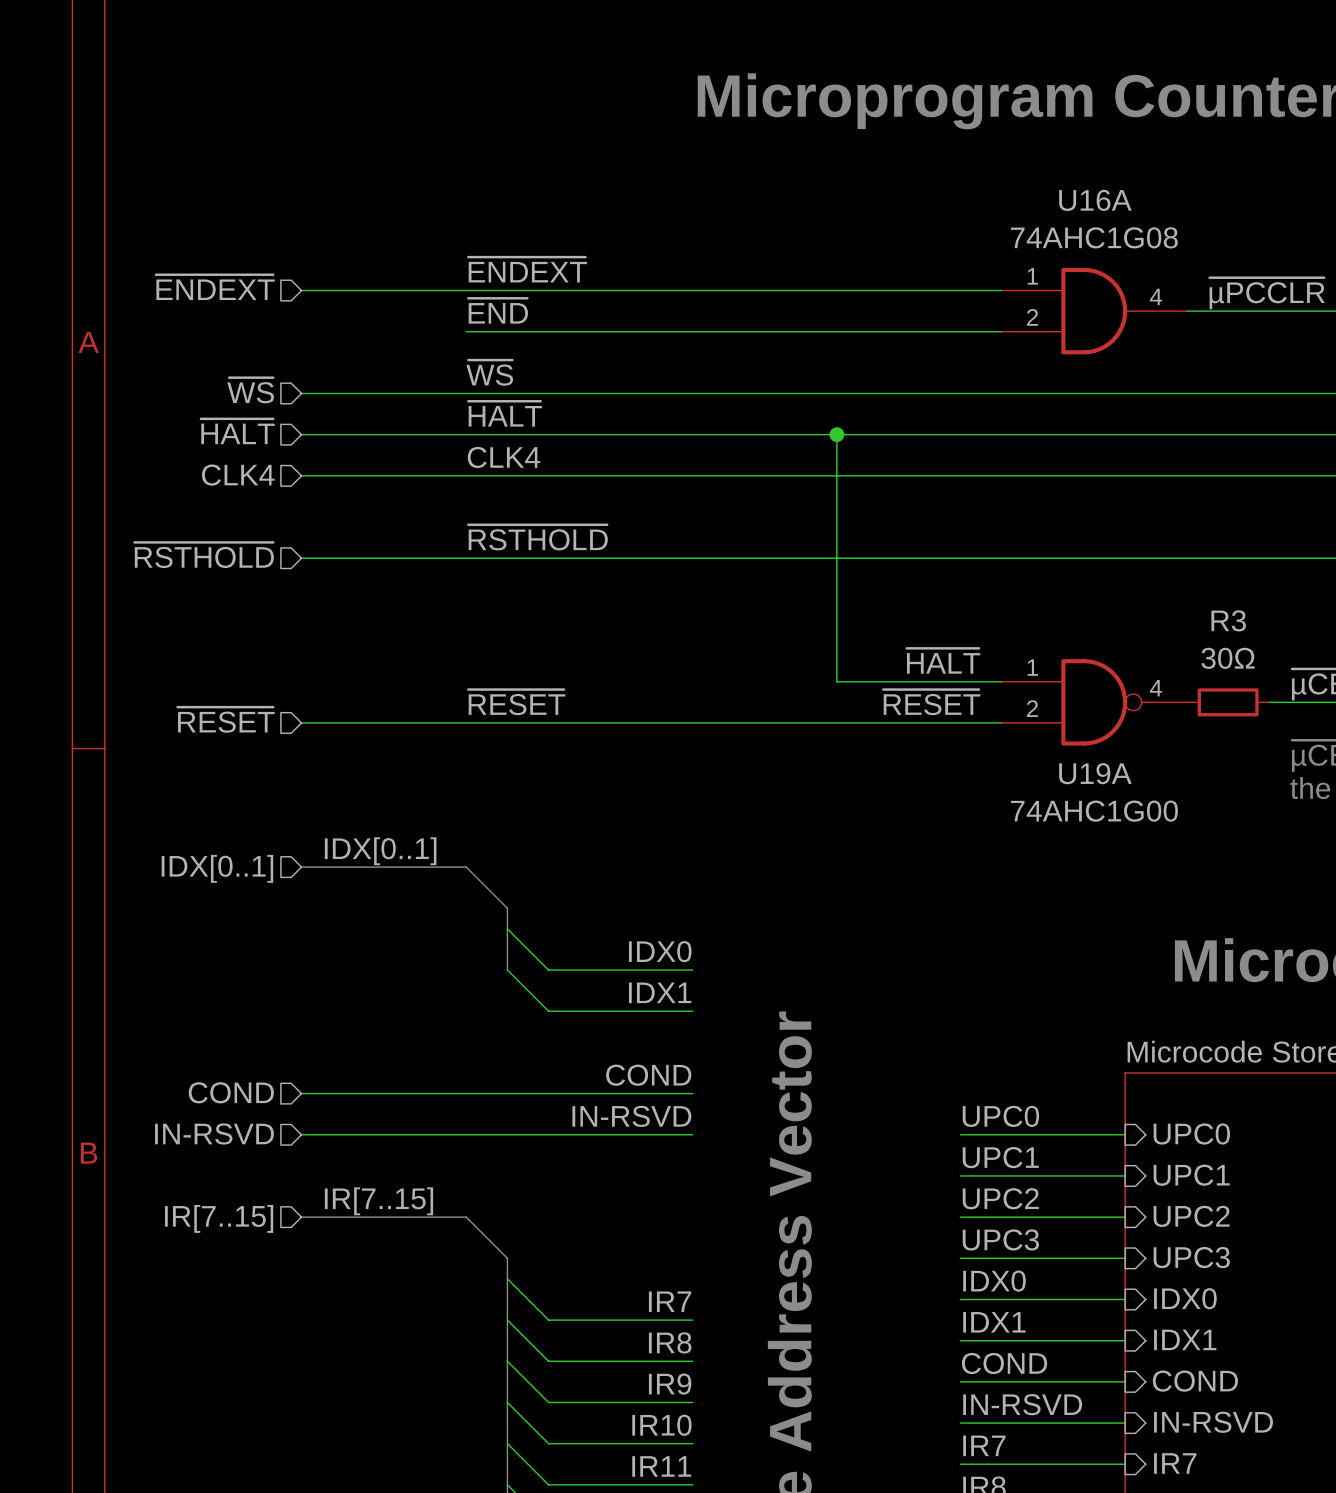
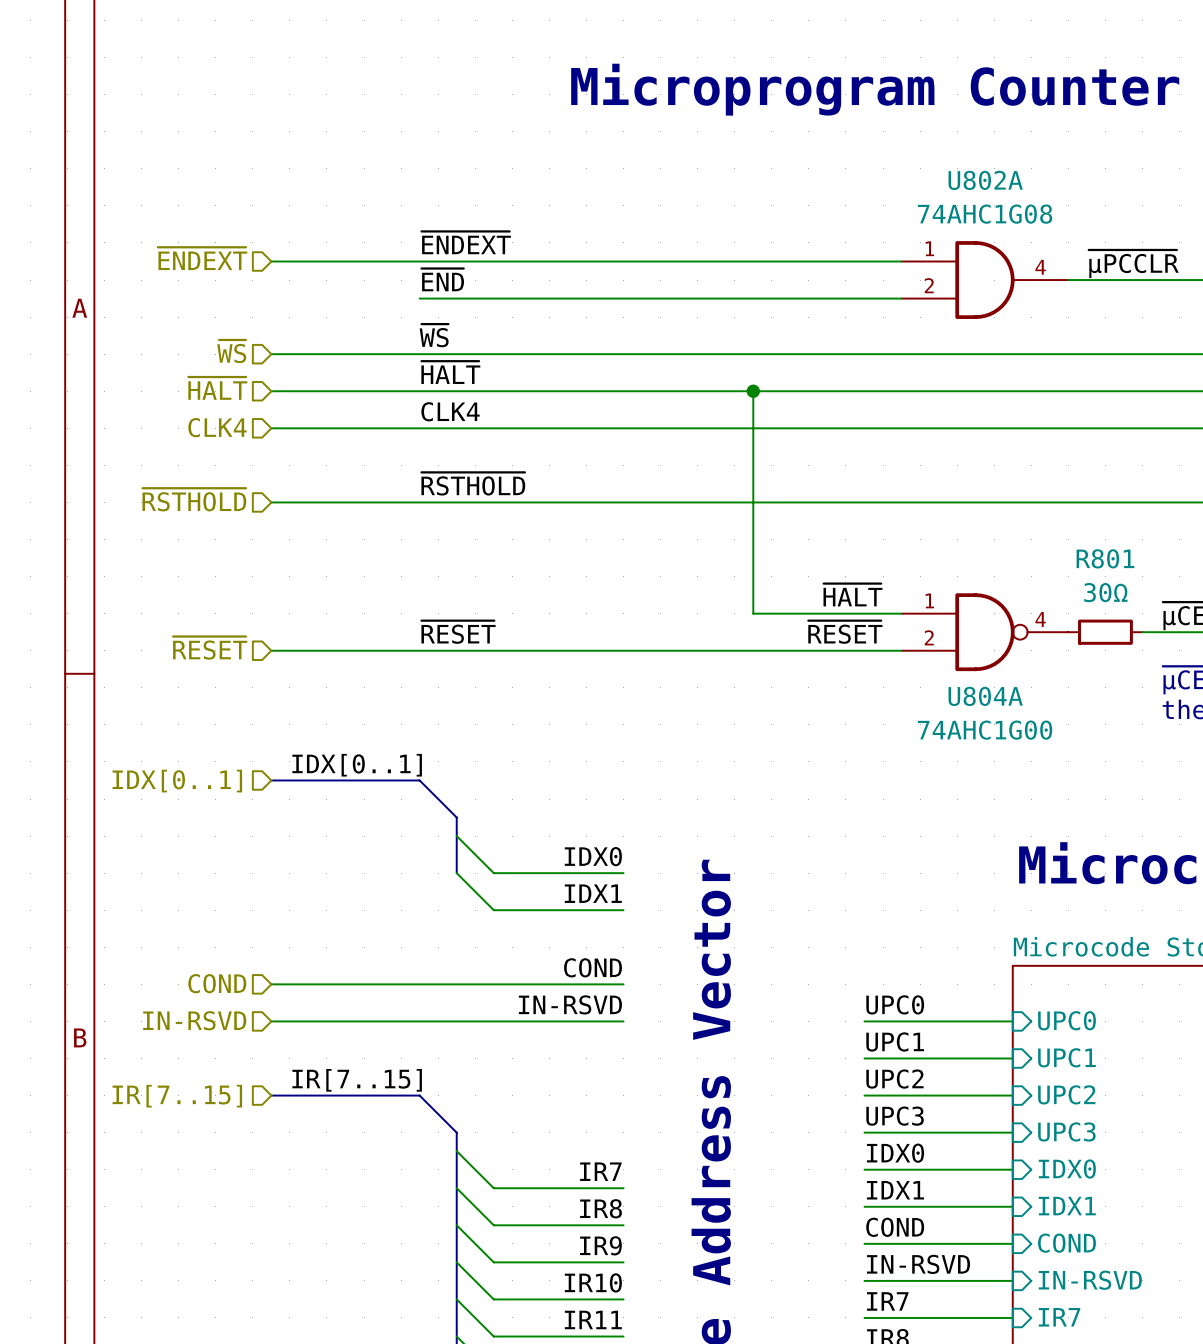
U16A name: U16A (1095, 200) -> U802A (985, 180)
R3 name: R3 (1228, 620) -> R801 (1105, 558)
U19A name: U19A (1095, 773) -> U804A (985, 696)

